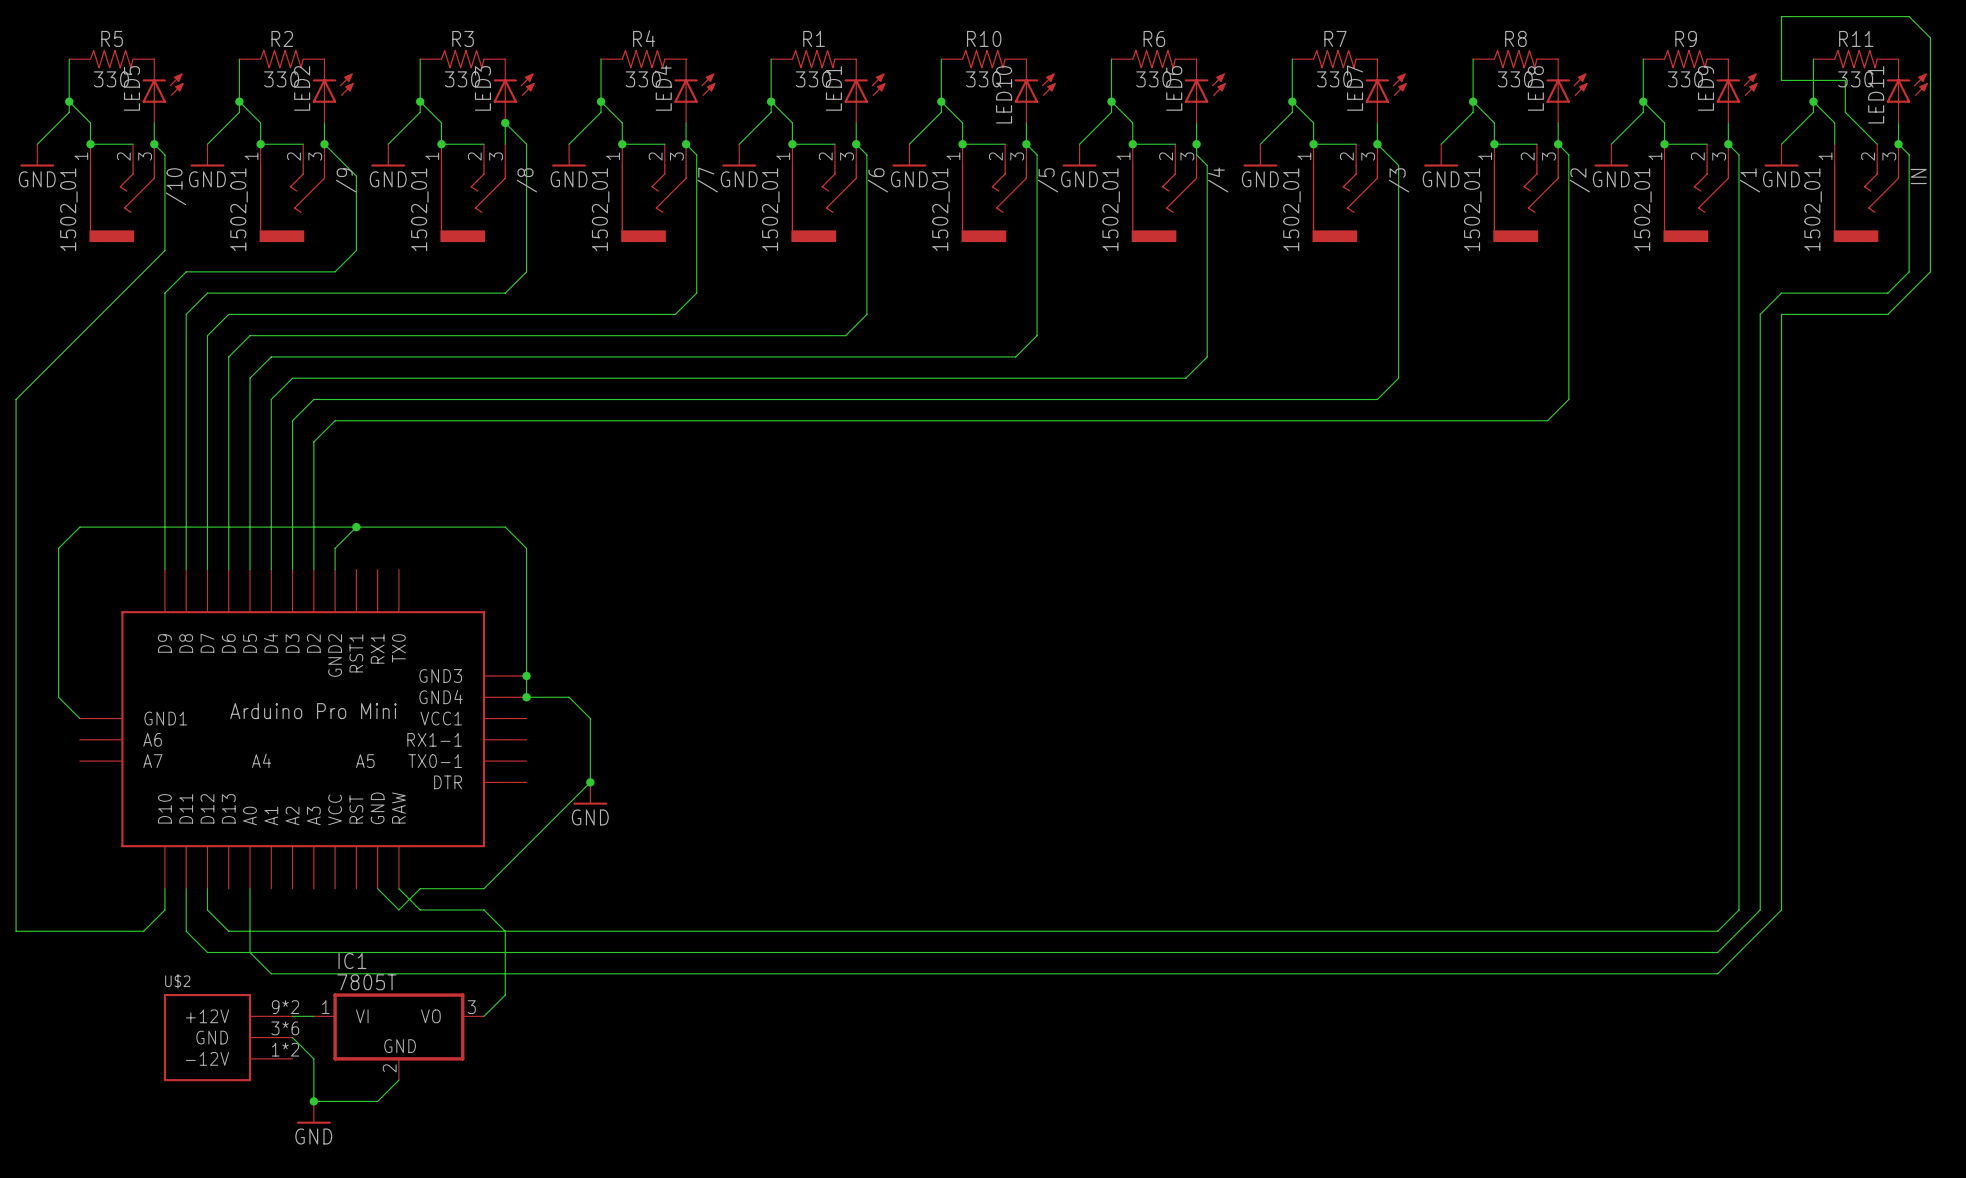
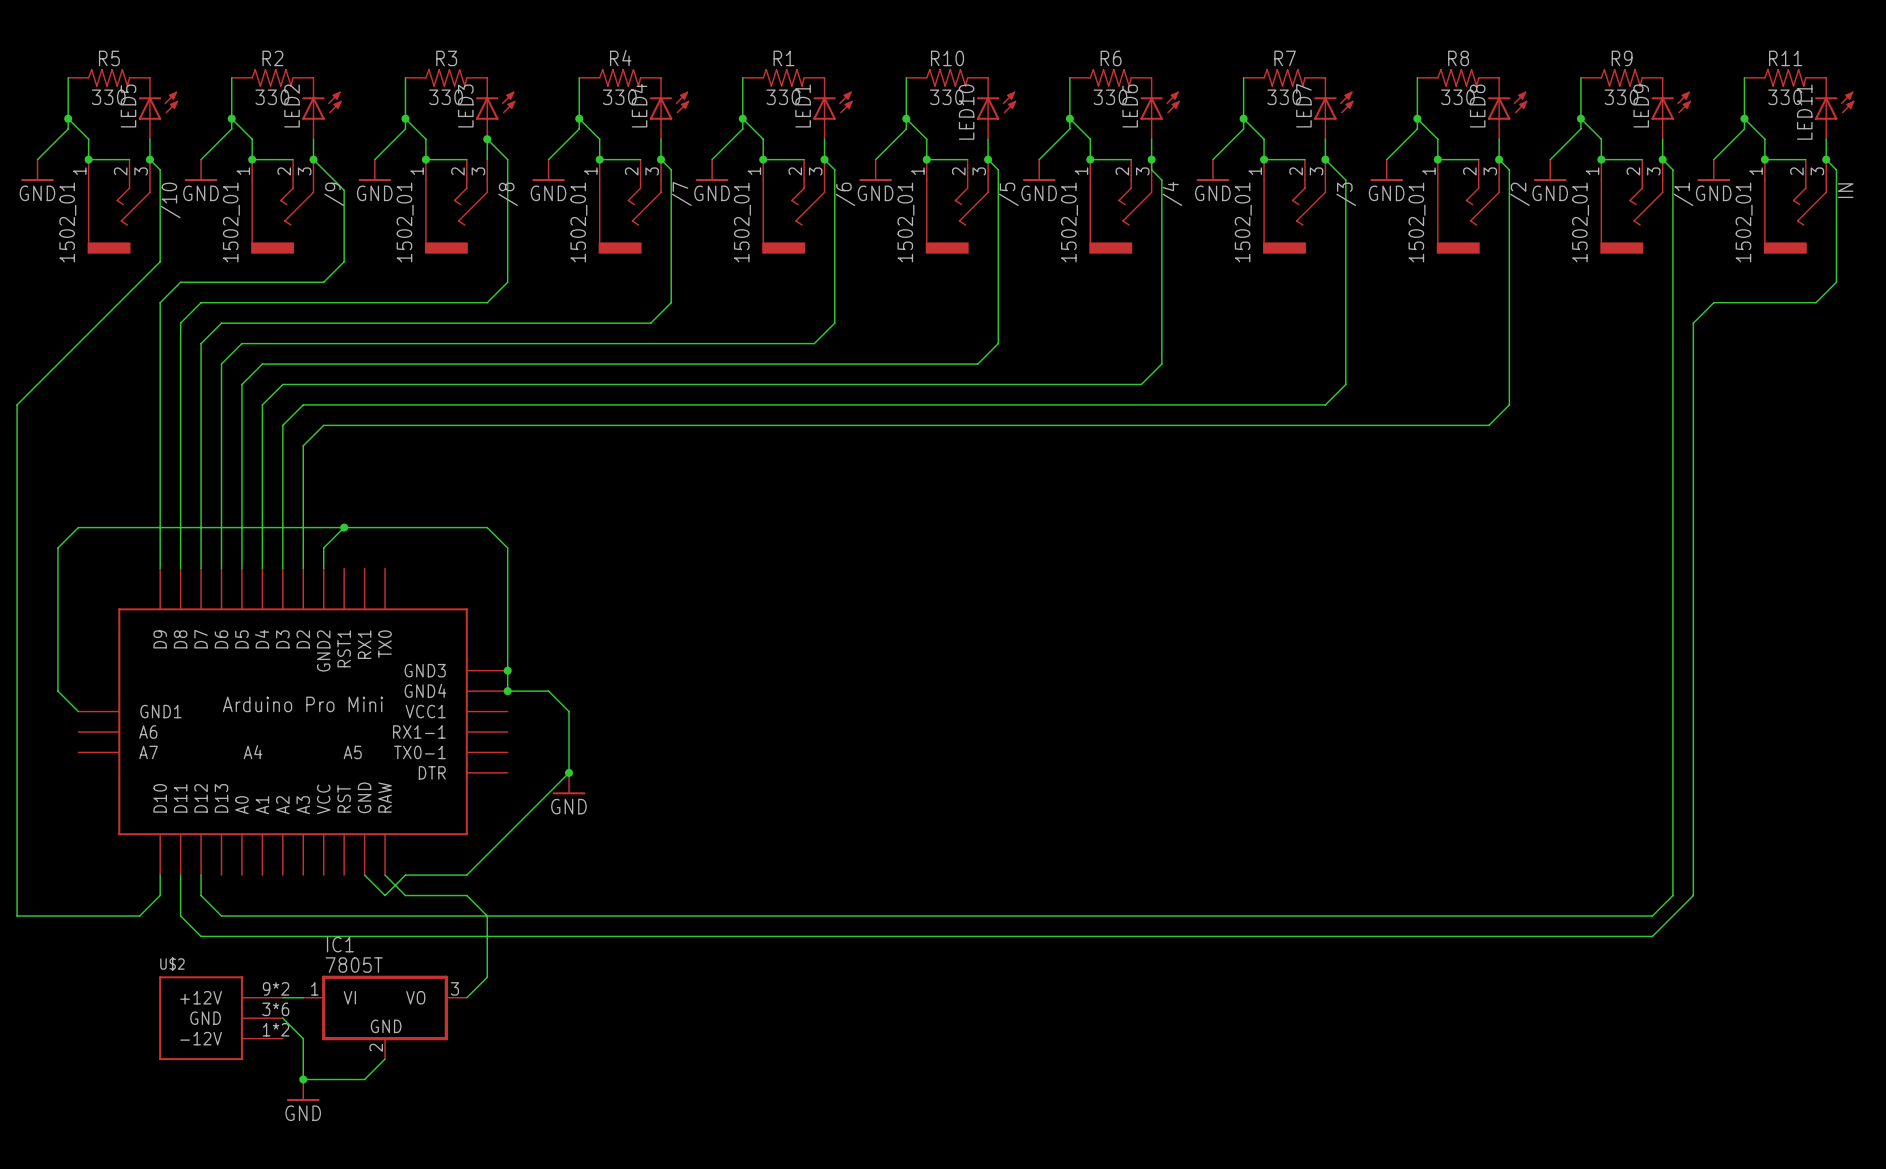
junction: none -> (1764, 159)
wire: (1877, 144) (1845, 112) (1845, 80) (1781, 80) (1781, 16) (1909, 16) (1930, 37) (1930, 271) (1887, 314) (1781, 314) (1781, 909) (1717, 973) (271, 973) (250, 952) (250, 888) -> (1805, 159) (1764, 159)

